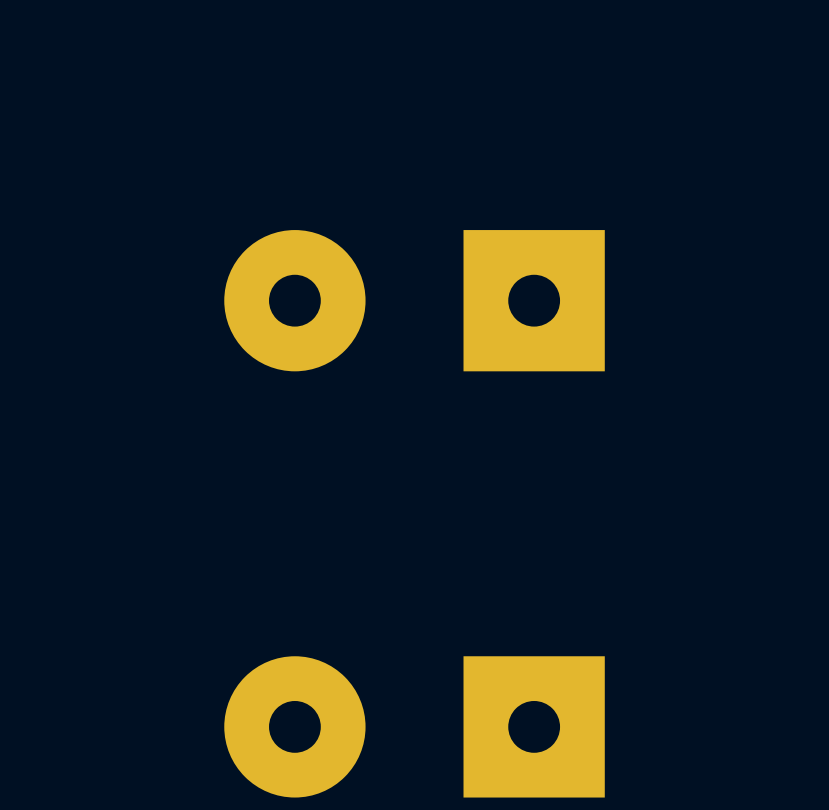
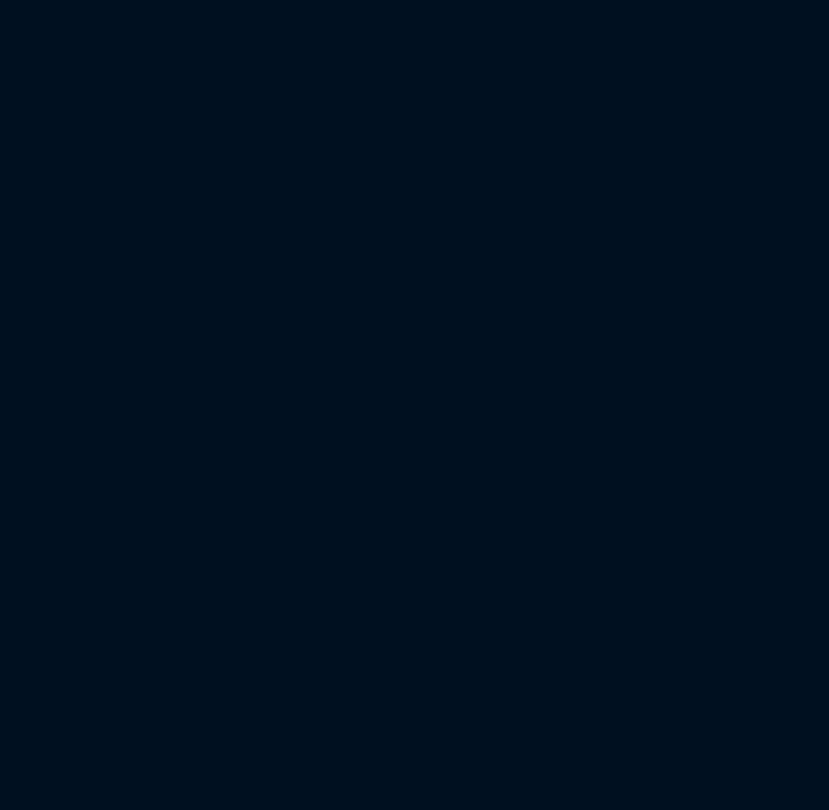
part: (414, 300) -> none
part: (414, 726) -> none

